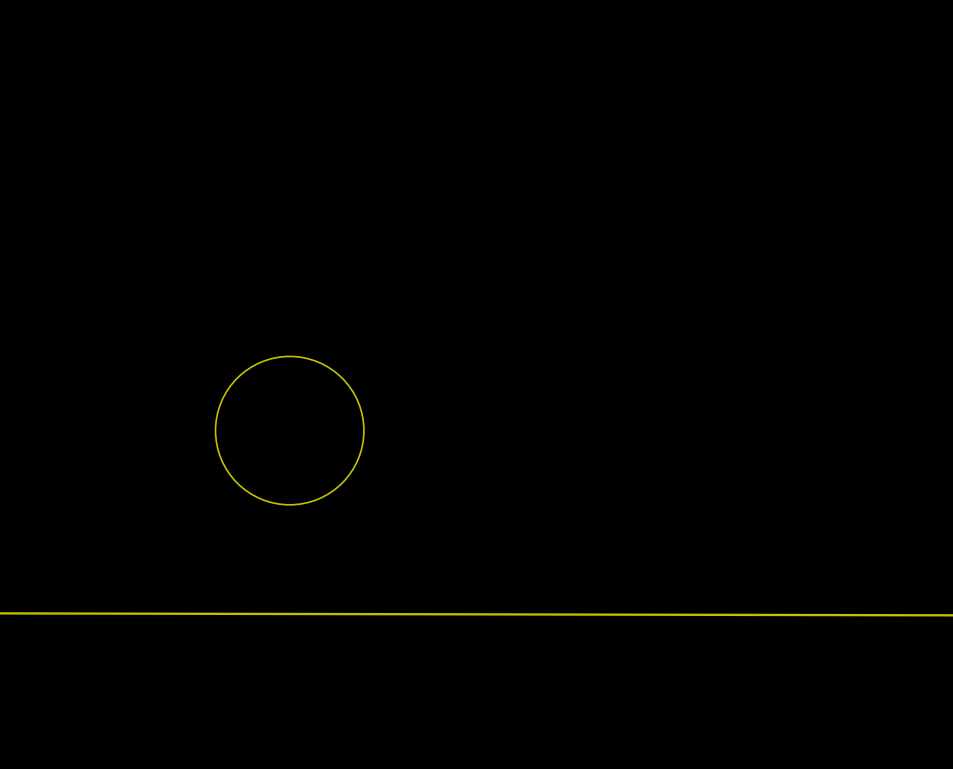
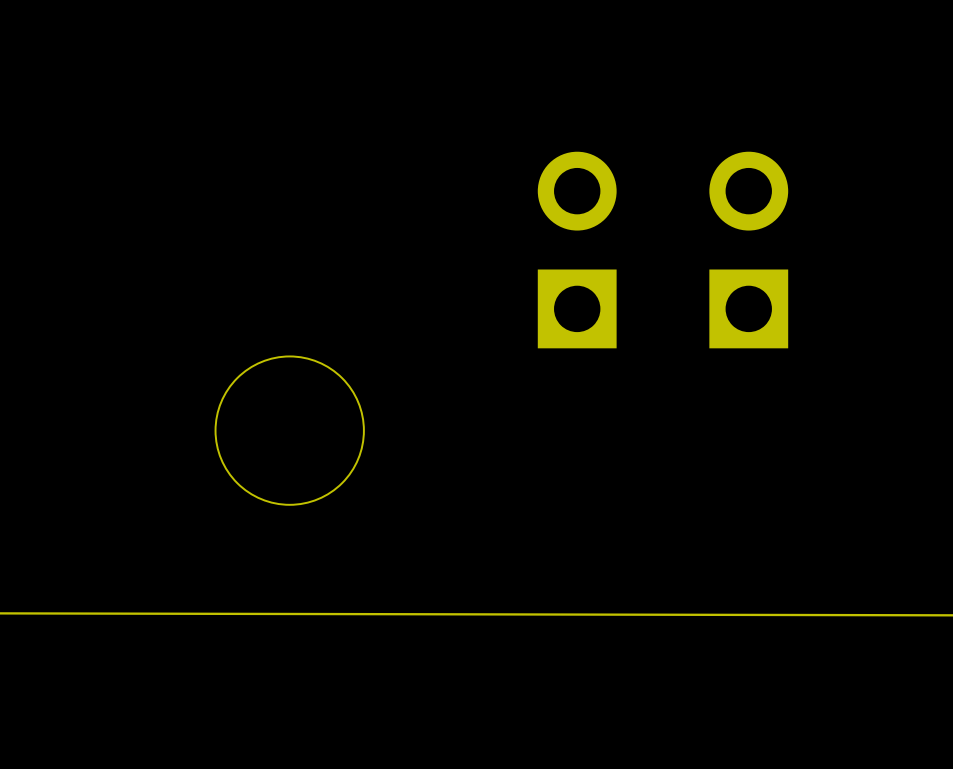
part: none -> (577, 250)
part: none -> (748, 250)

